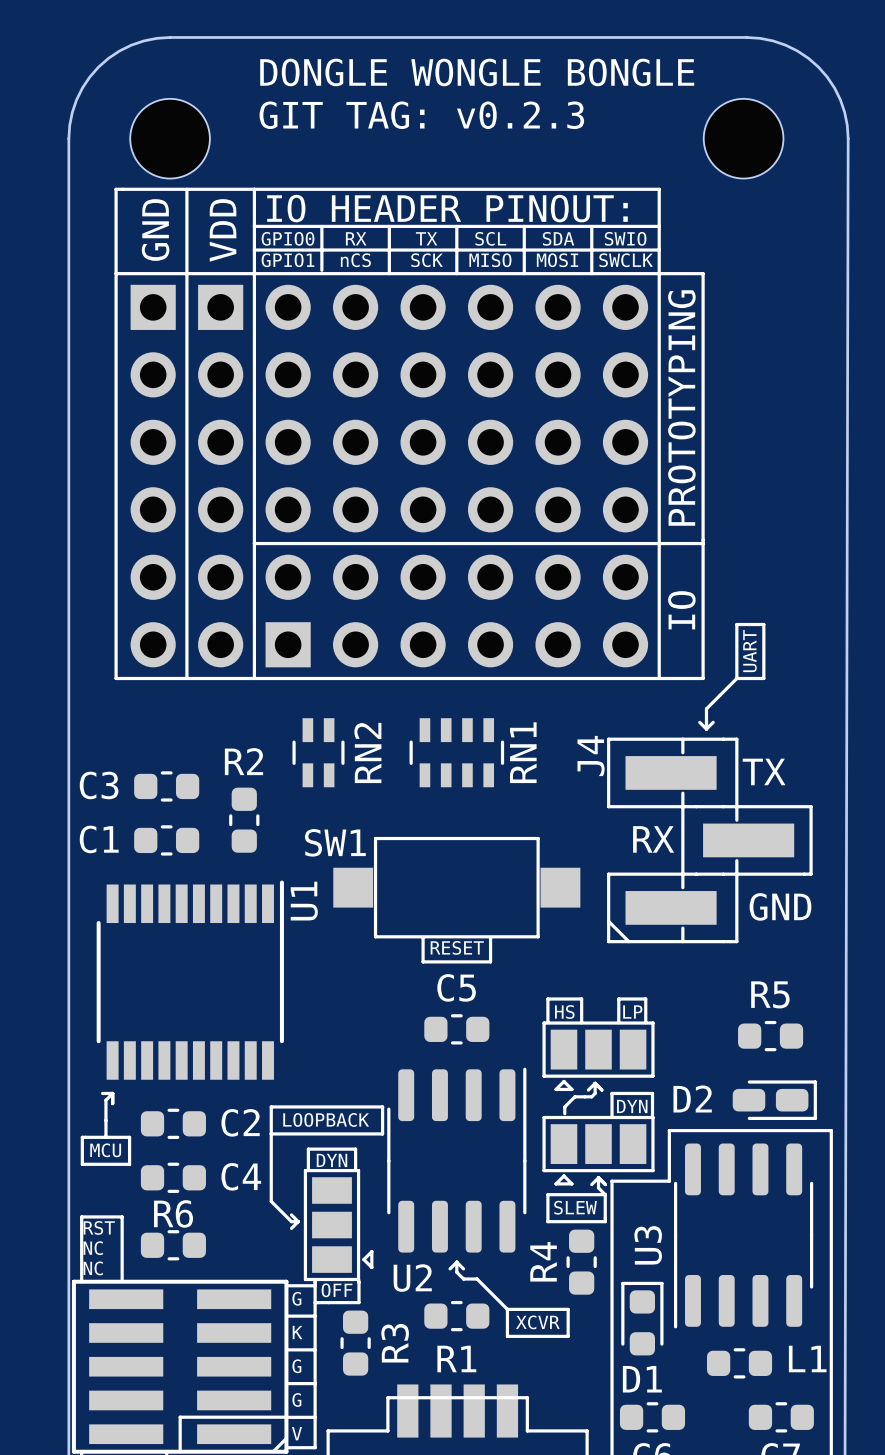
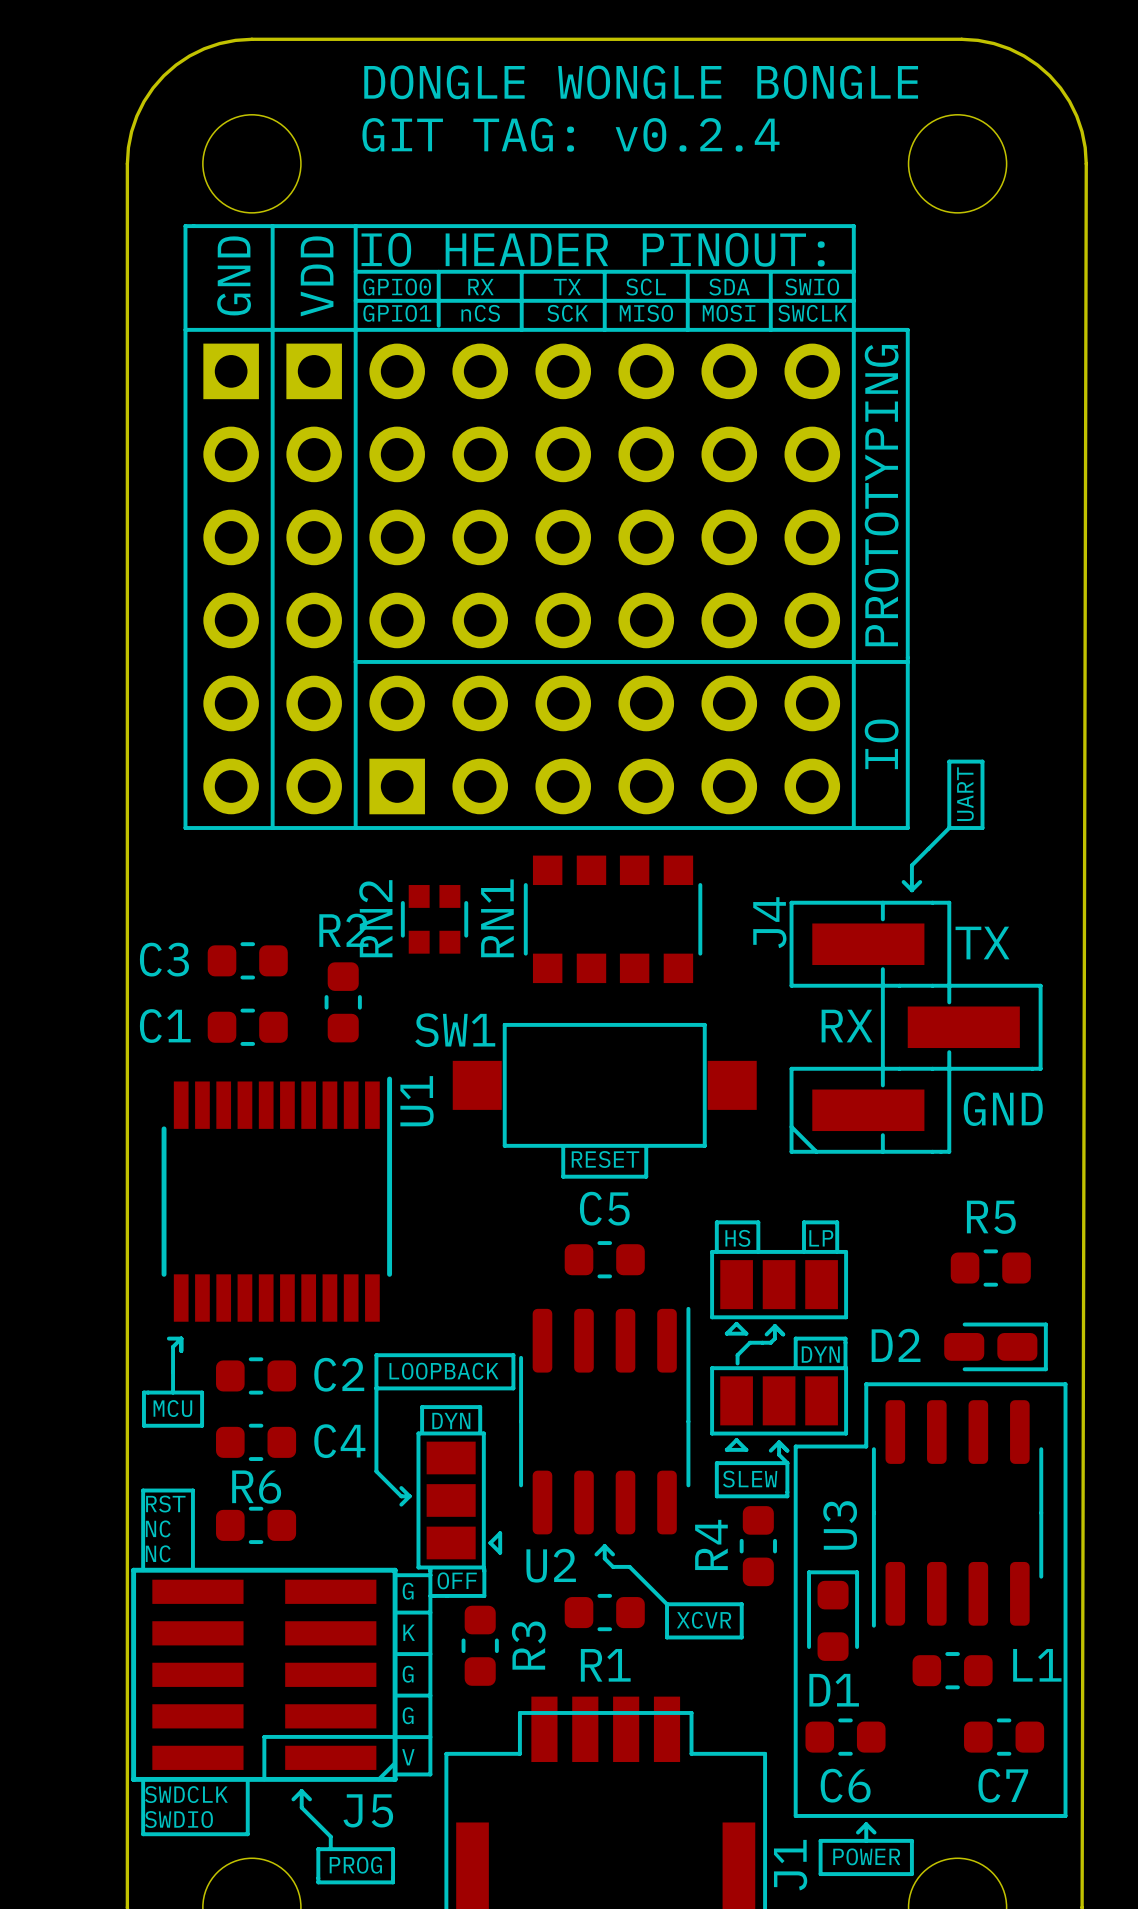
text: GIT TAG: v0.2.3 (421, 115) -> GIT TAG: v0.2.4 (570, 134)
RN2 footprint: [292, 718, 345, 788] -> [400, 885, 469, 954]
RN1 footprint: [409, 718, 505, 788] -> [523, 855, 703, 984]
RN2 name position: RN2 (367, 752) -> RN2 (375, 918)
RN1 name position: RN1 (523, 752) -> RN1 (497, 918)

